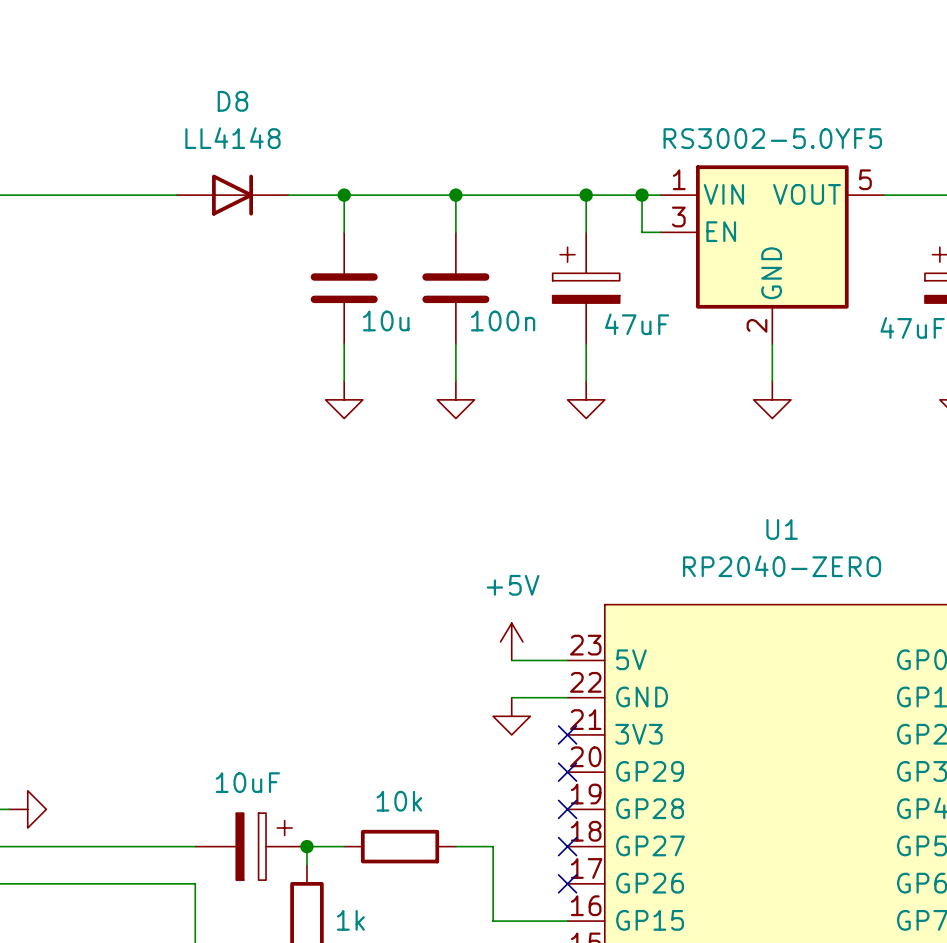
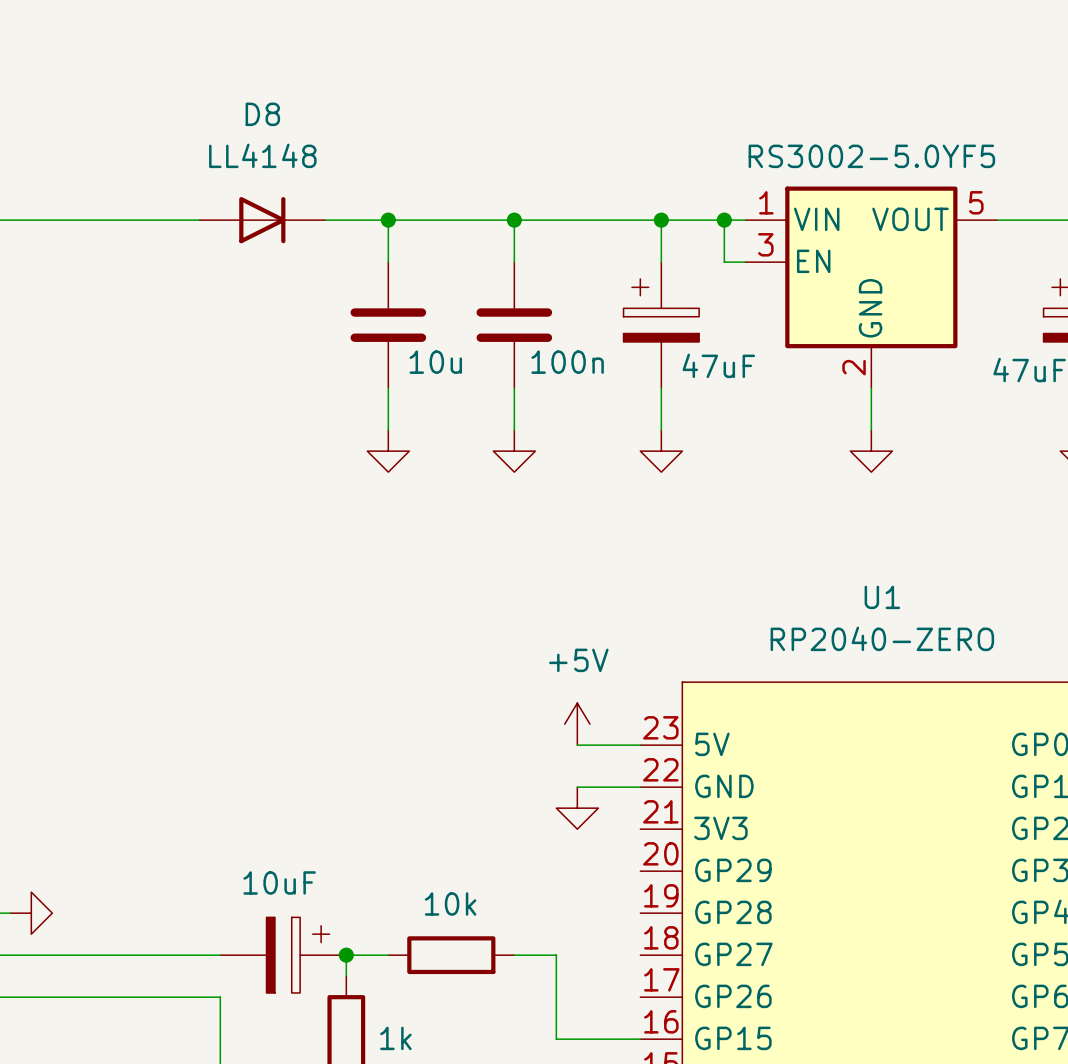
no-connect mark: (567, 734) -> none
no-connect mark: (567, 772) -> none
no-connect mark: (567, 809) -> none
no-connect mark: (567, 846) -> none
no-connect mark: (567, 883) -> none

